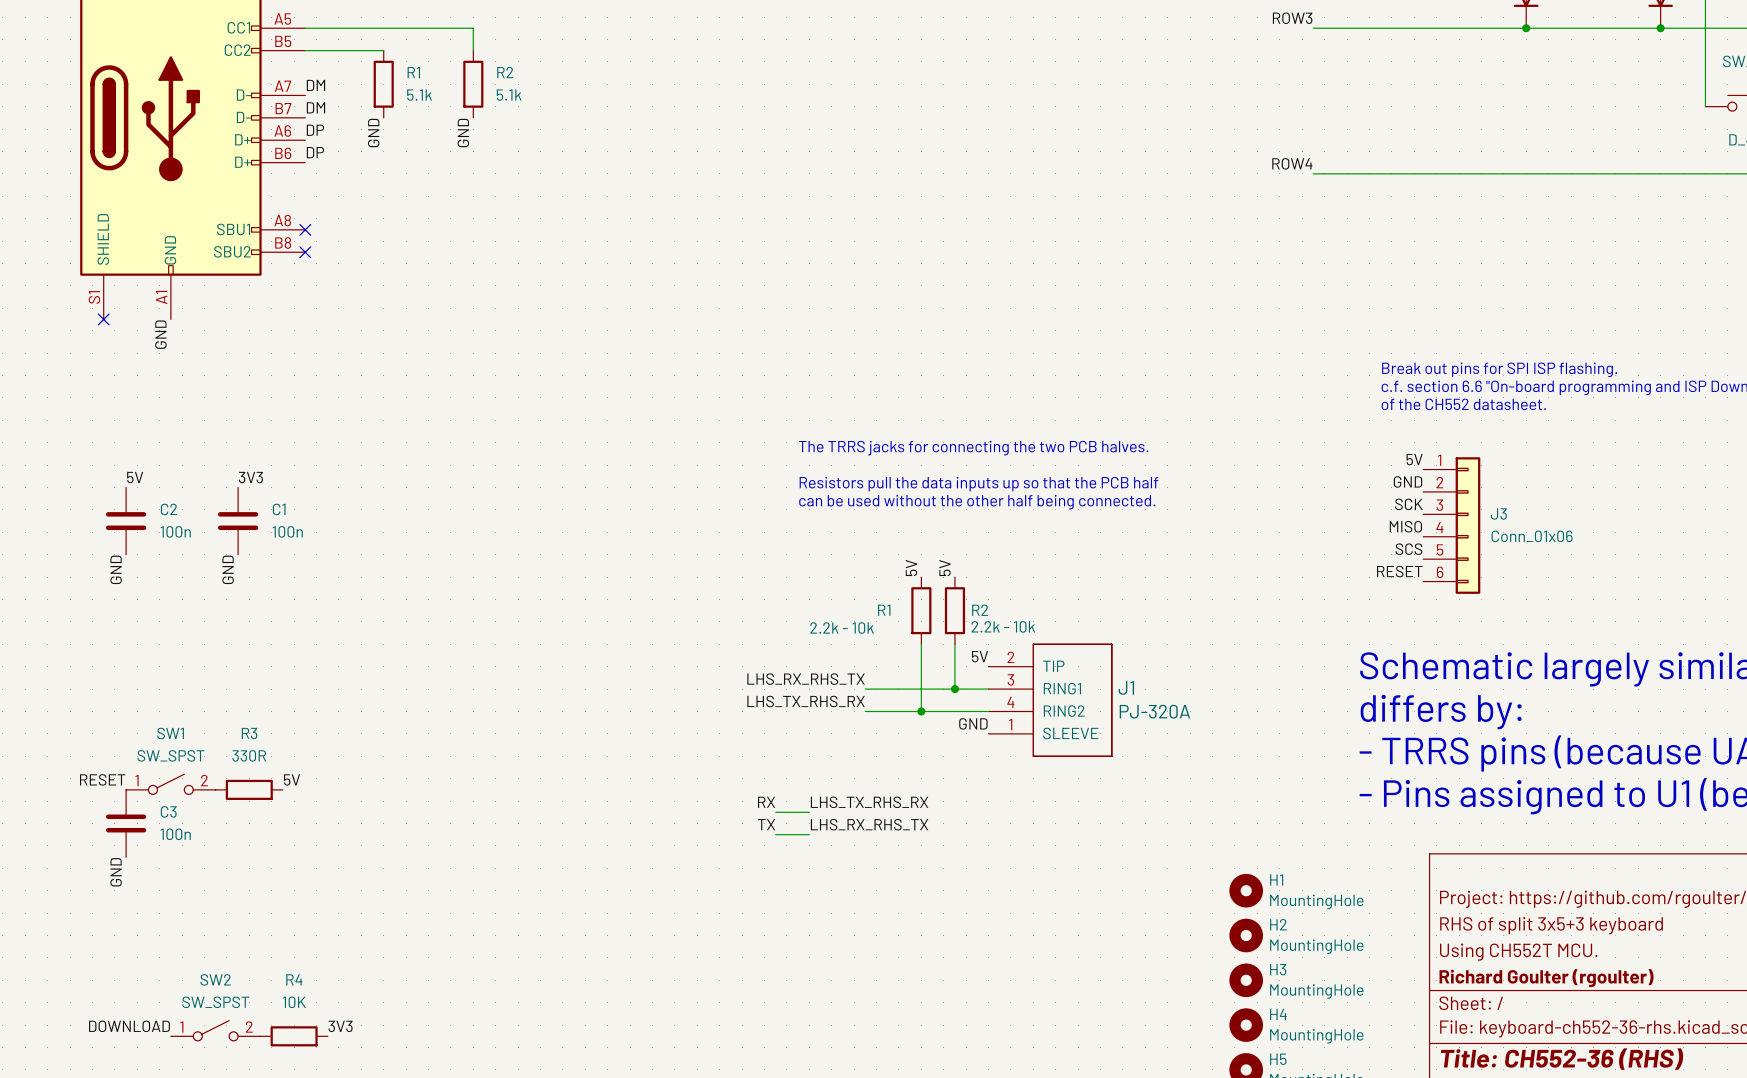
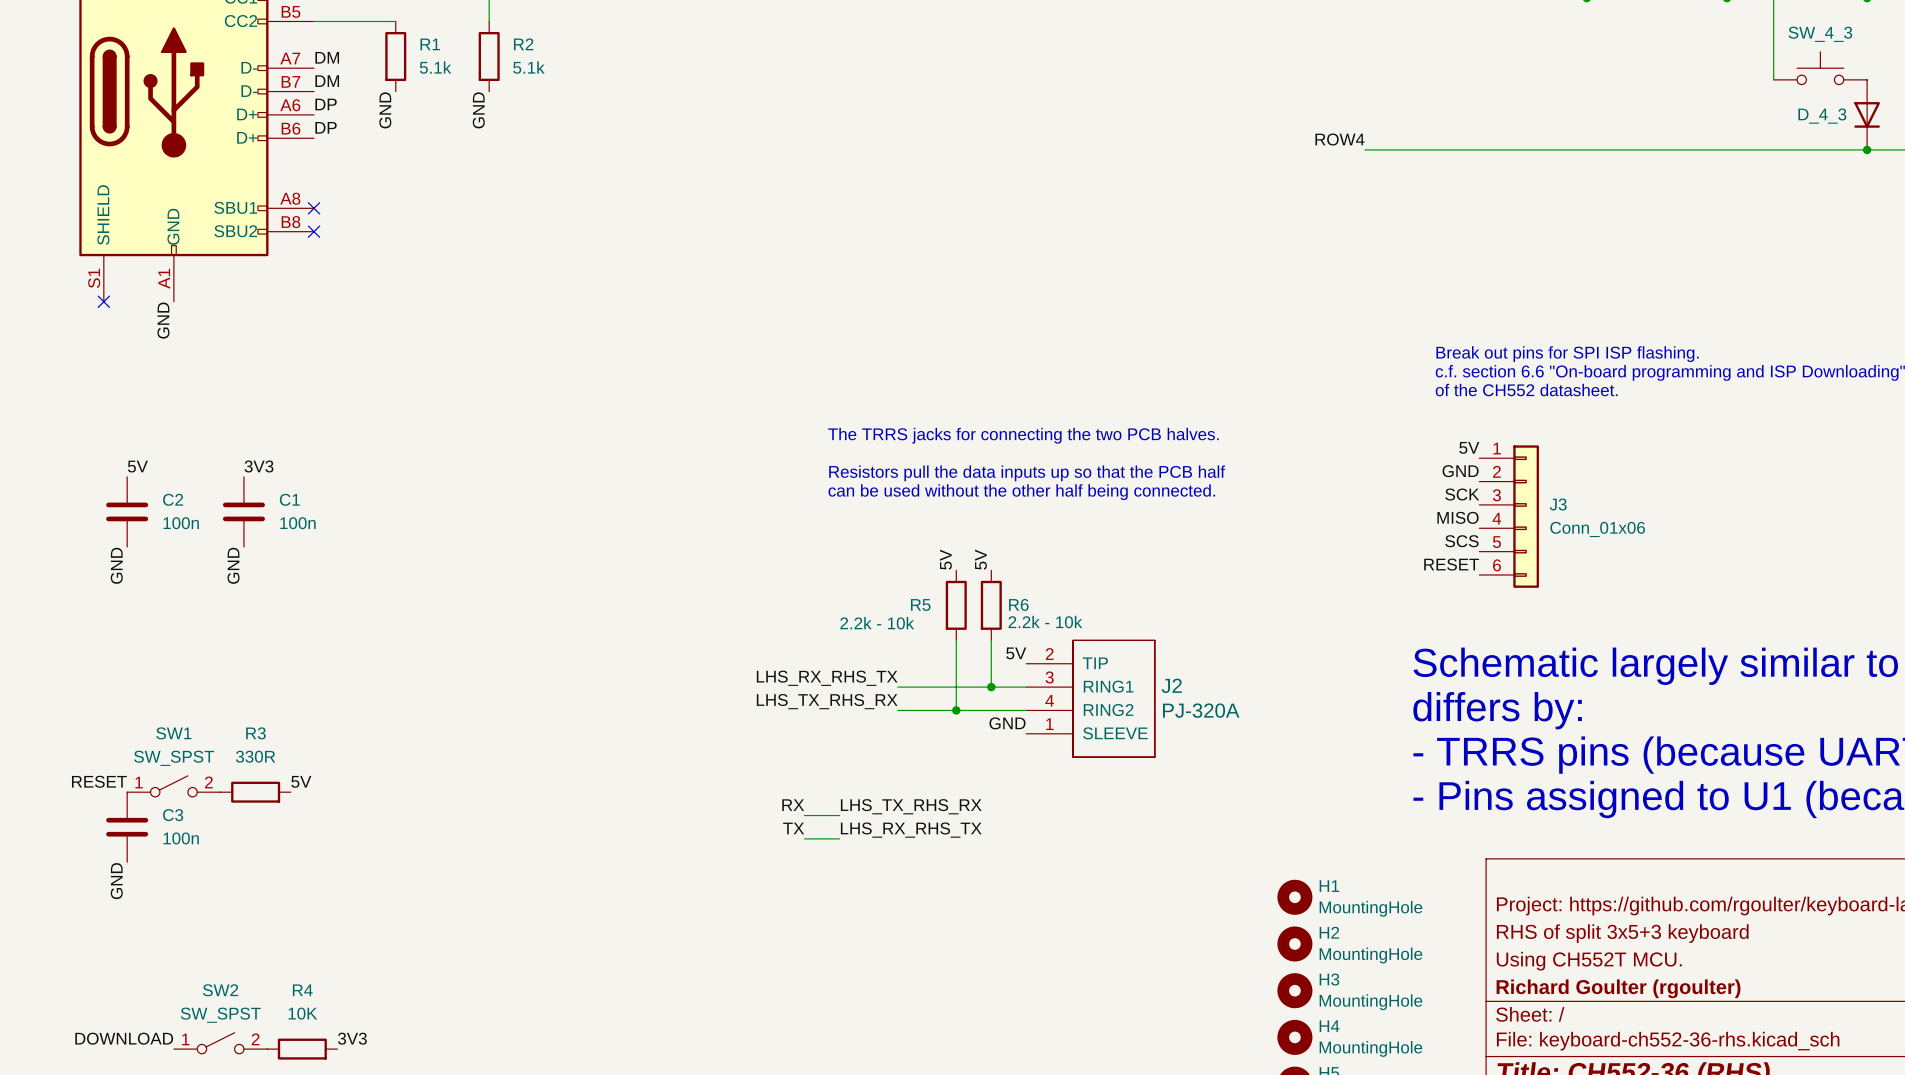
R1 name: R1 (884, 610) -> R5 (920, 605)
R2 name: R2 (980, 610) -> R6 (1018, 604)
J1 name: J1 (1126, 687) -> J2 (1171, 685)

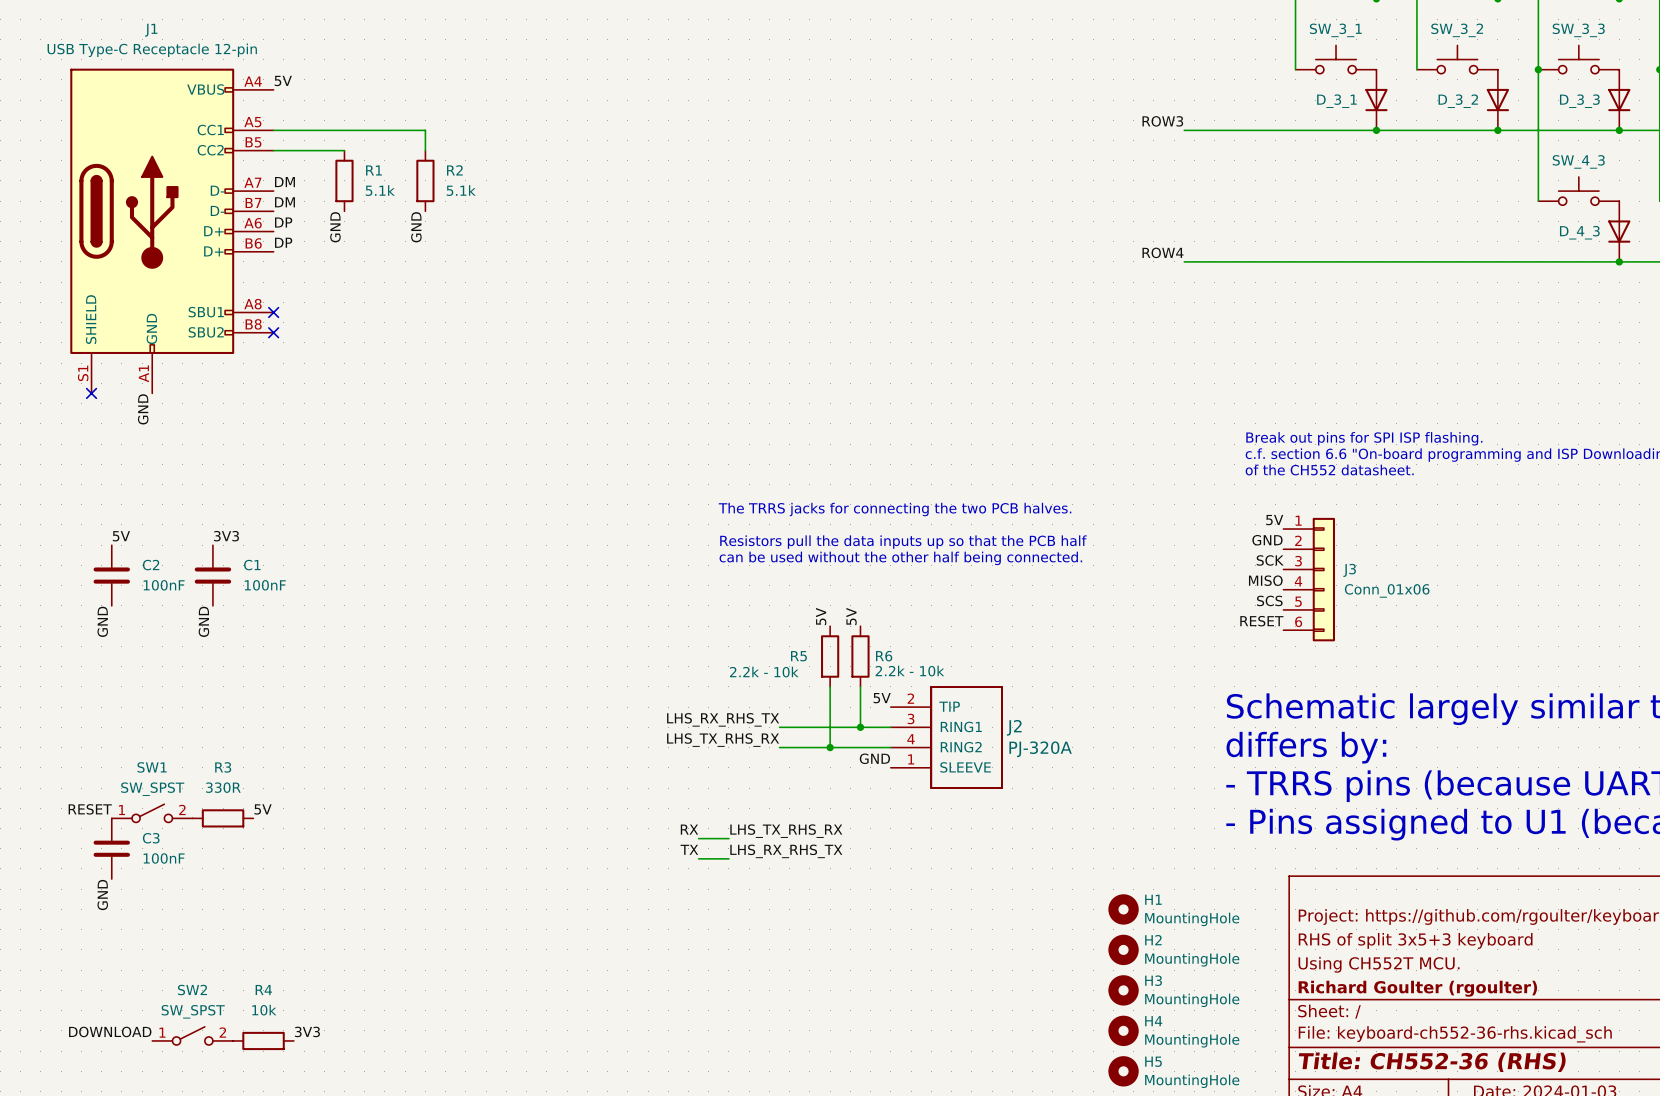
C2 value: 100n (181, 523) -> 100nF (164, 585)
C1 value: 100n (297, 523) -> 100nF (265, 585)
C3 value: 100n (181, 838) -> 100nF (164, 858)
R4 value: 10K (302, 1013) -> 10k (264, 1010)

